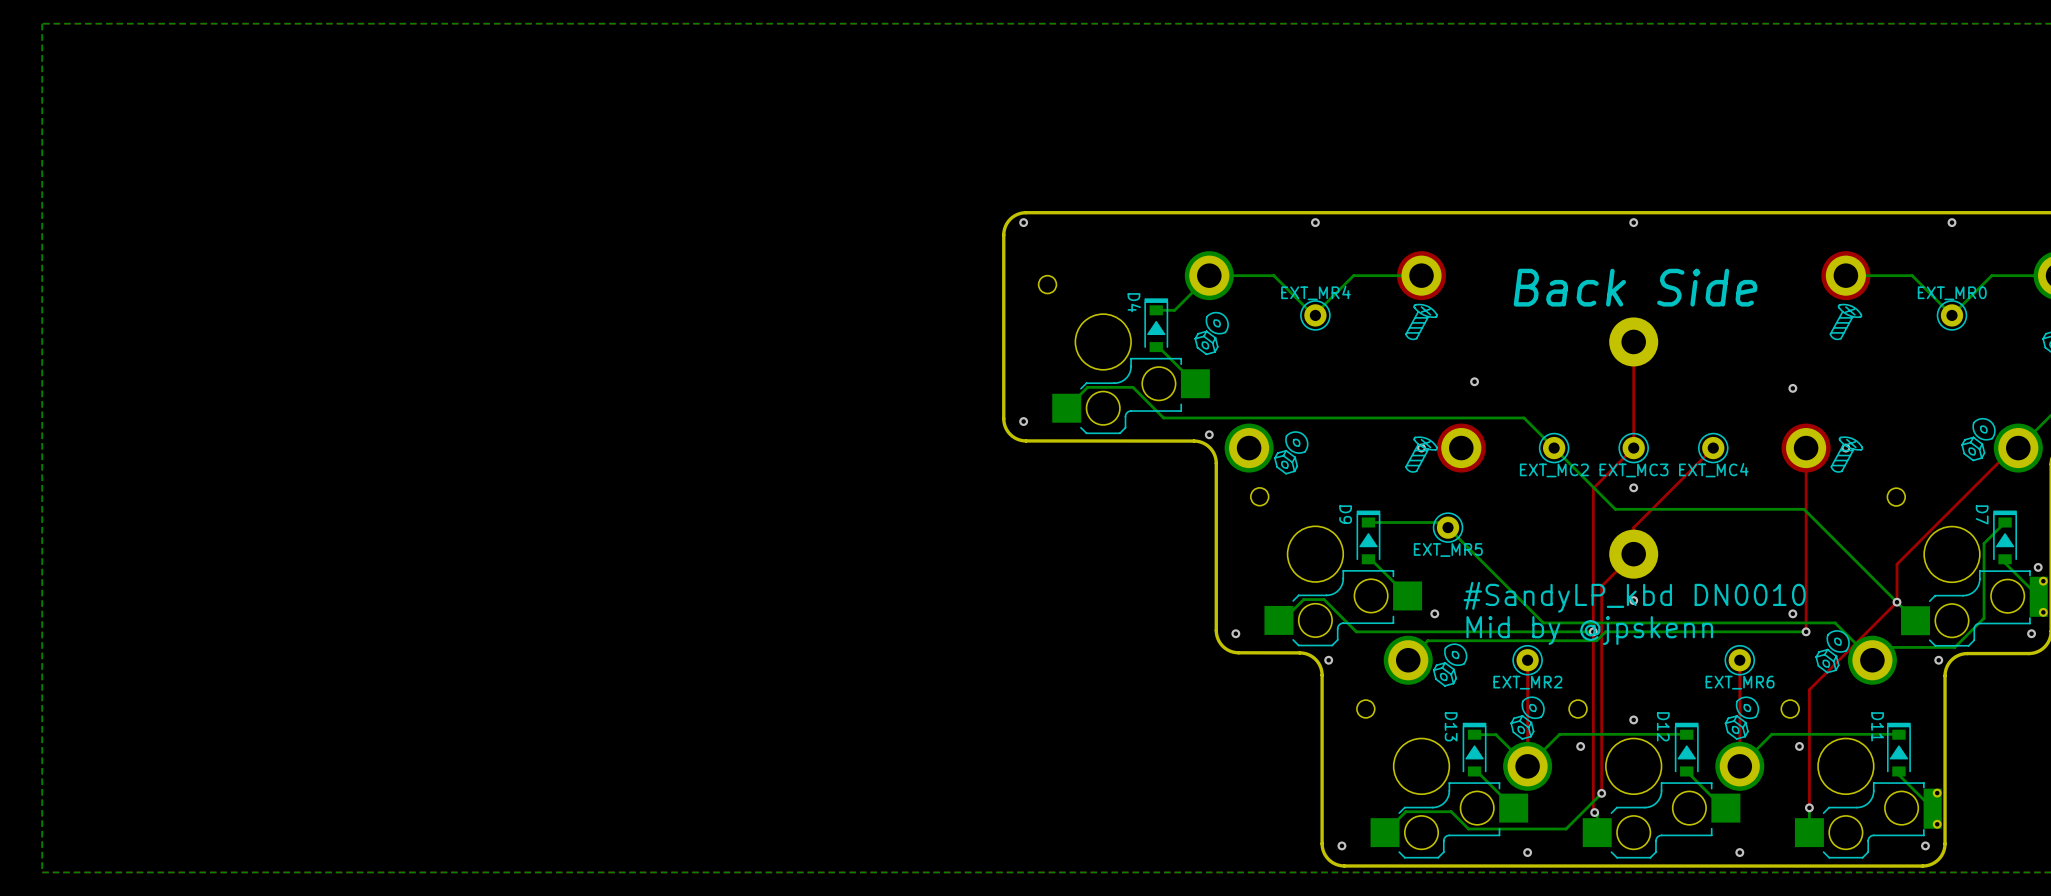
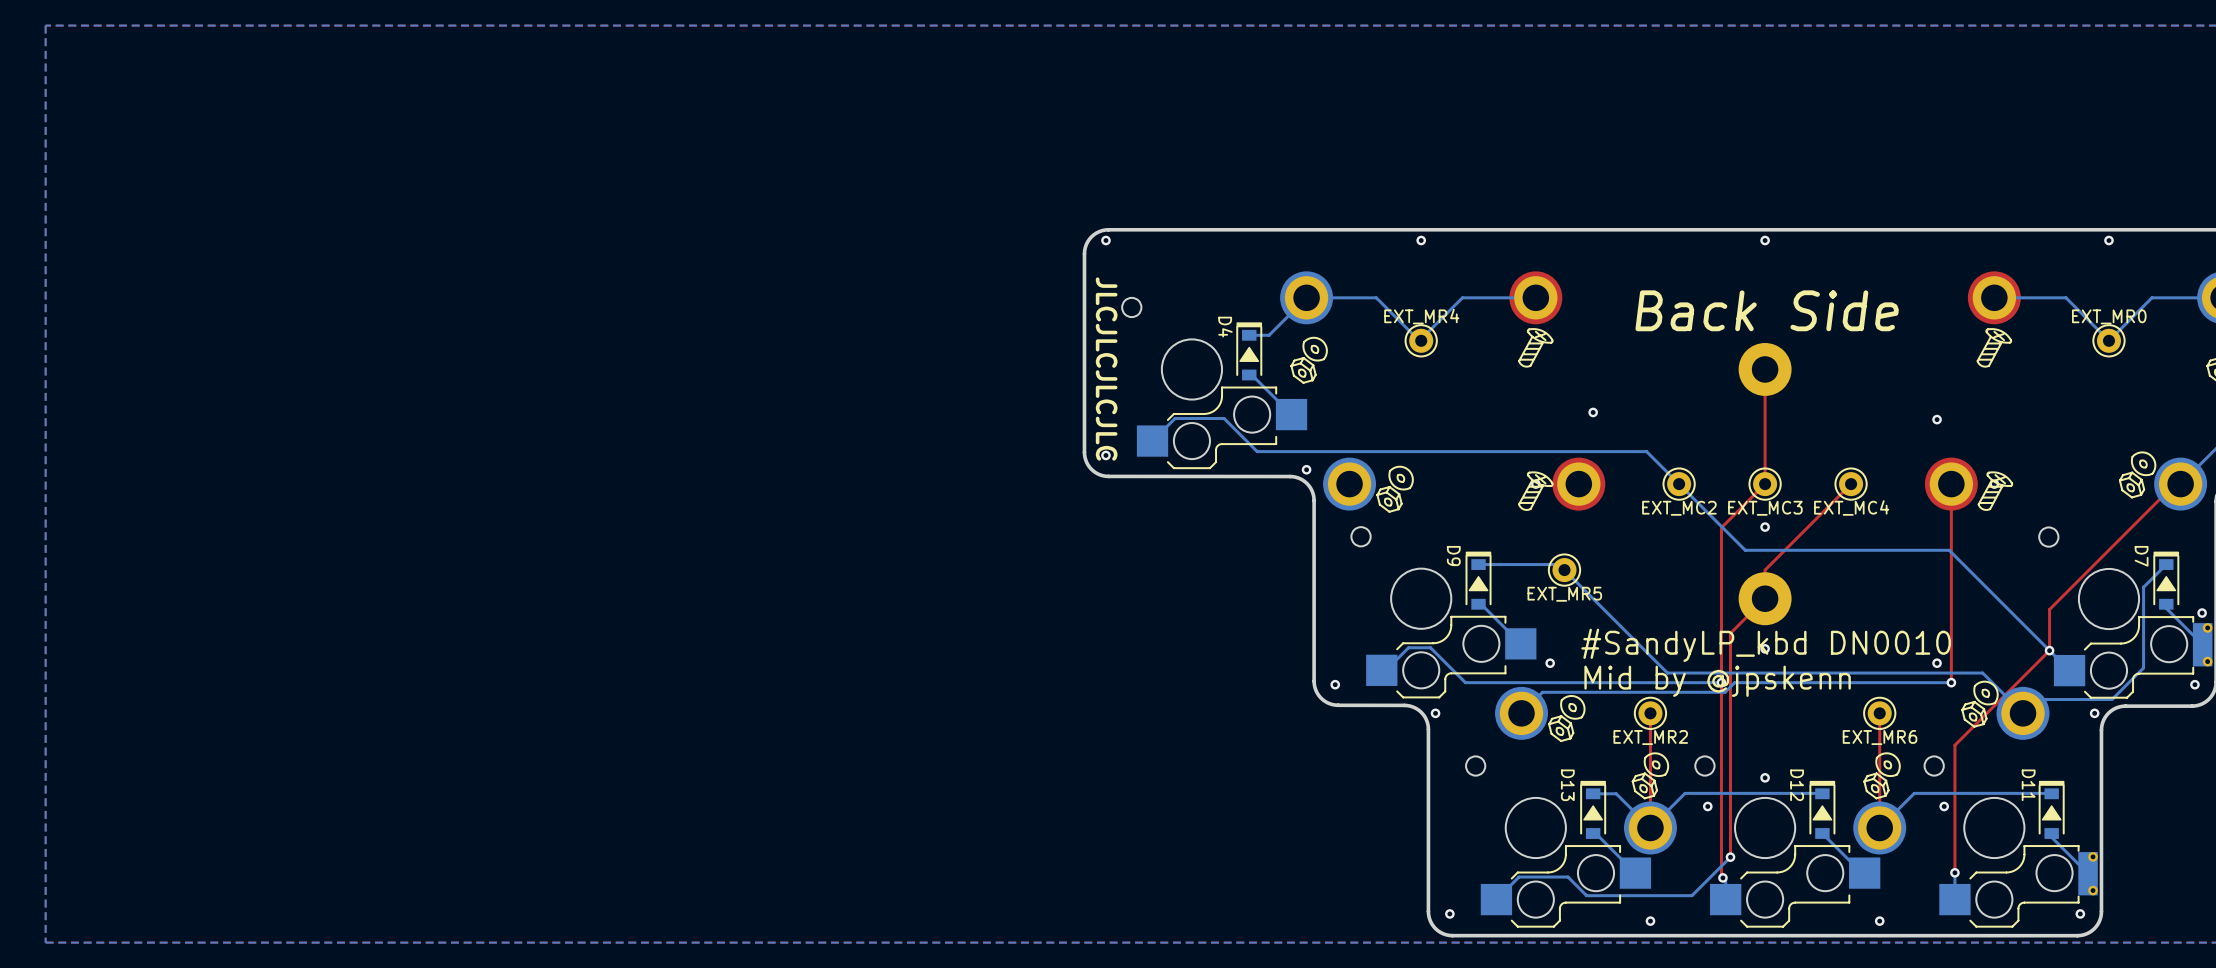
text: none -> JLCJLCJLCJLC (1106, 369)

